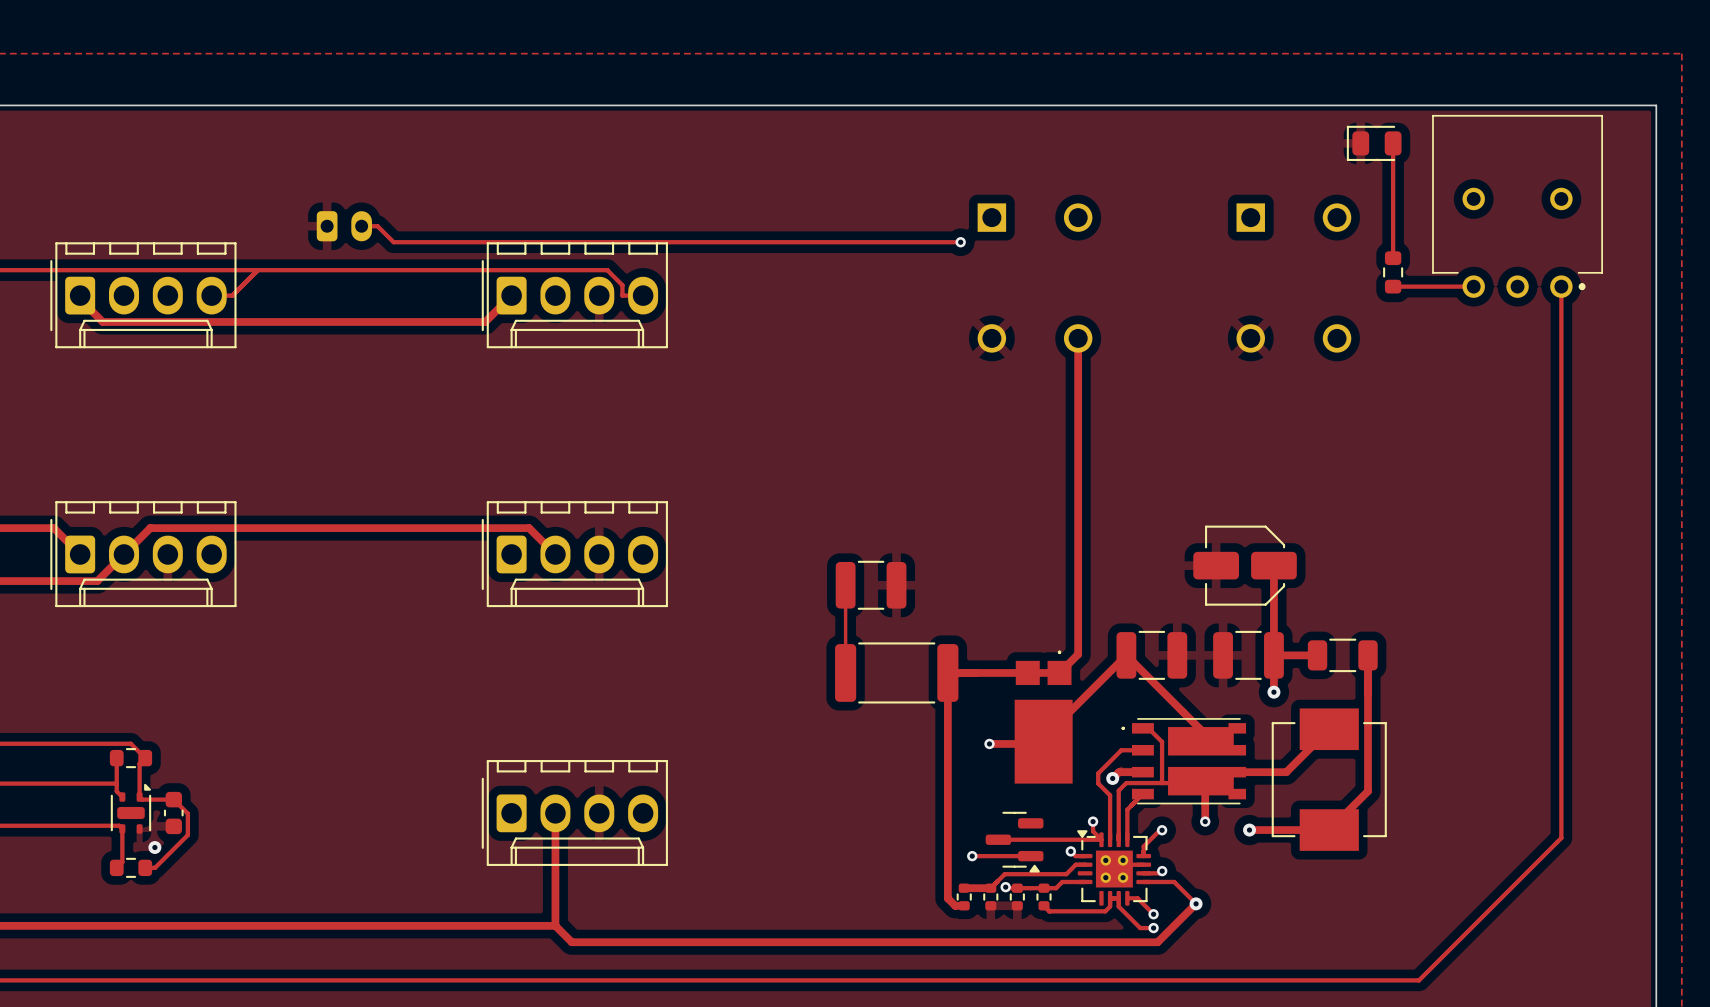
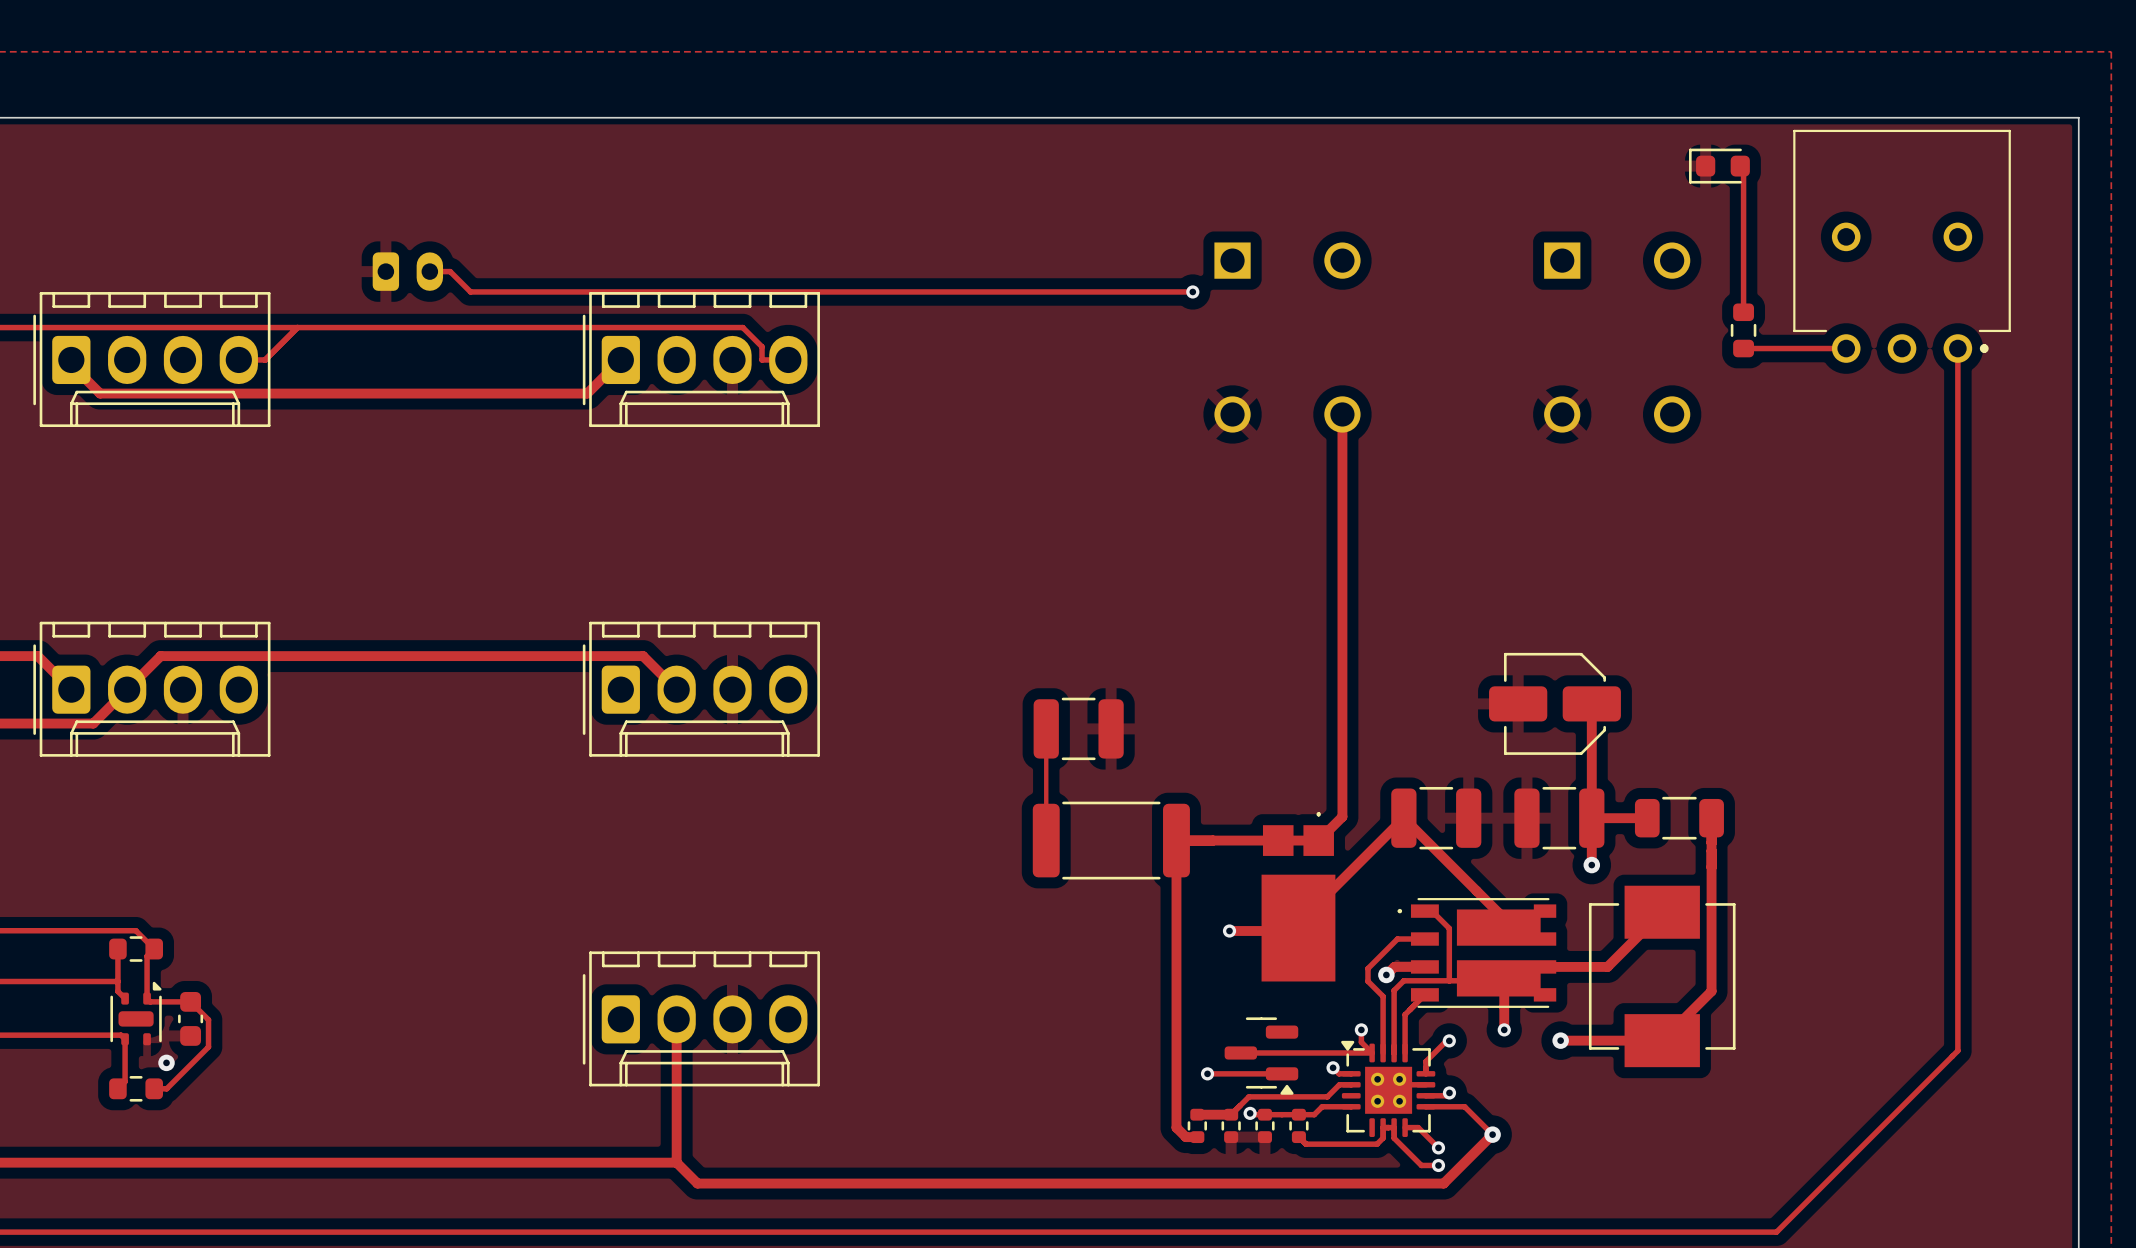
part footprint: [1346, 125, 1402, 162] -> [1689, 148, 1750, 184]

